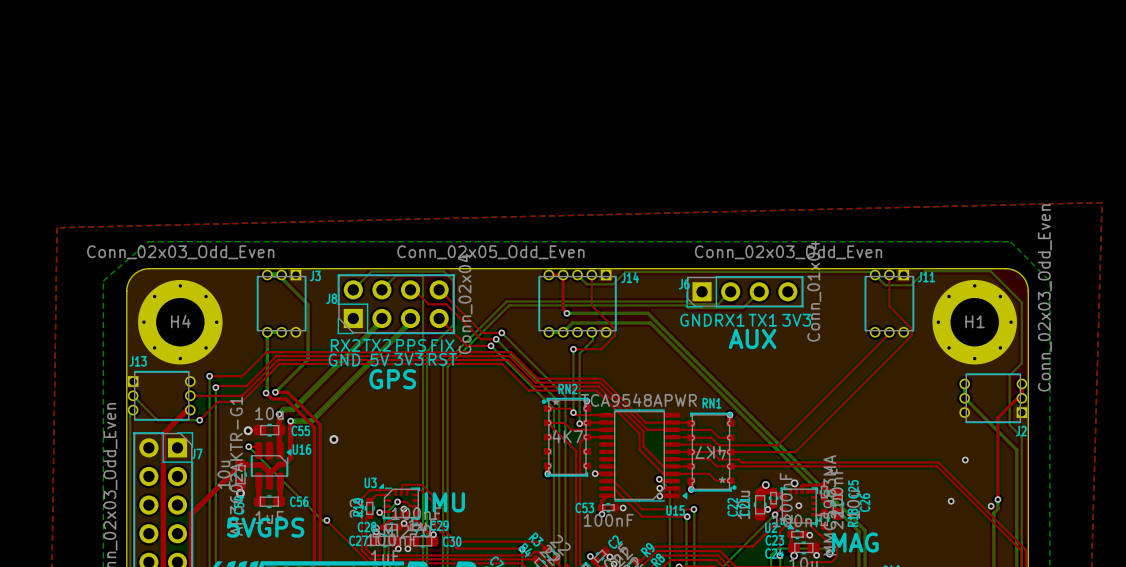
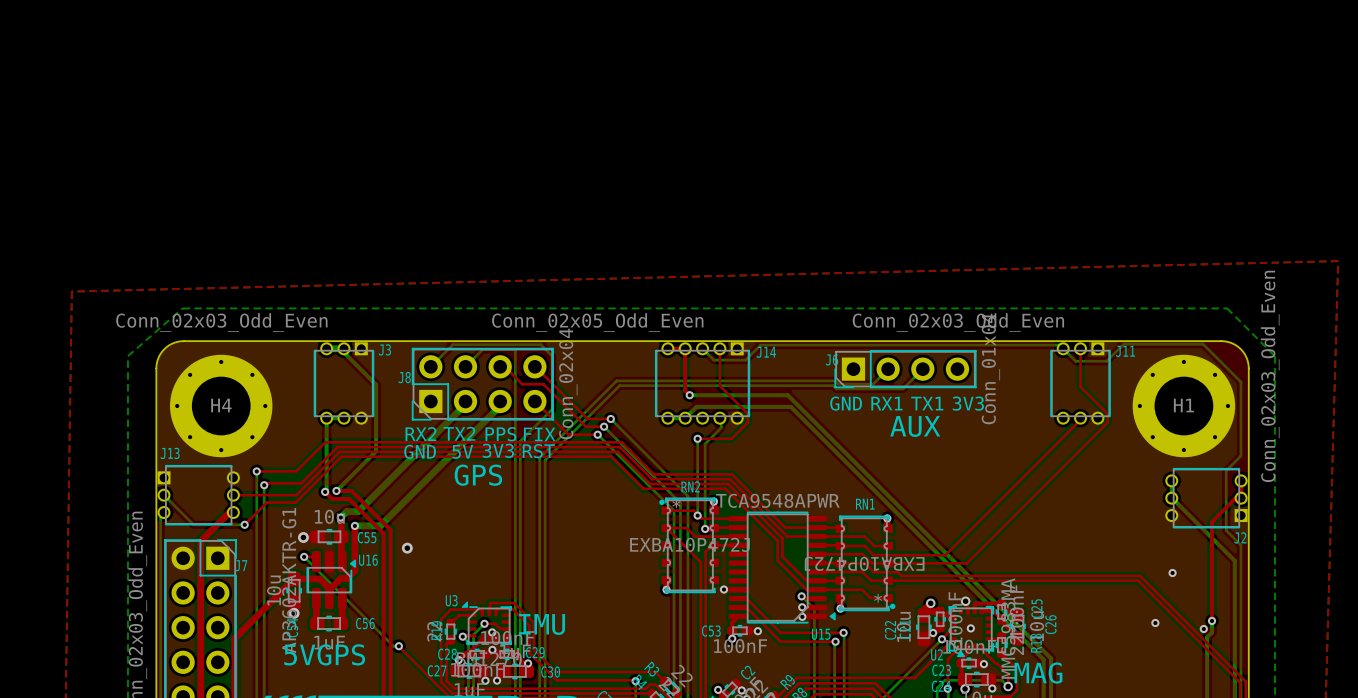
RN2 value: 4K7 (567, 436) -> EXBA10P472J (689, 544)
RN1 value: 4K7 (710, 452) -> EXBA10P472J (864, 563)

